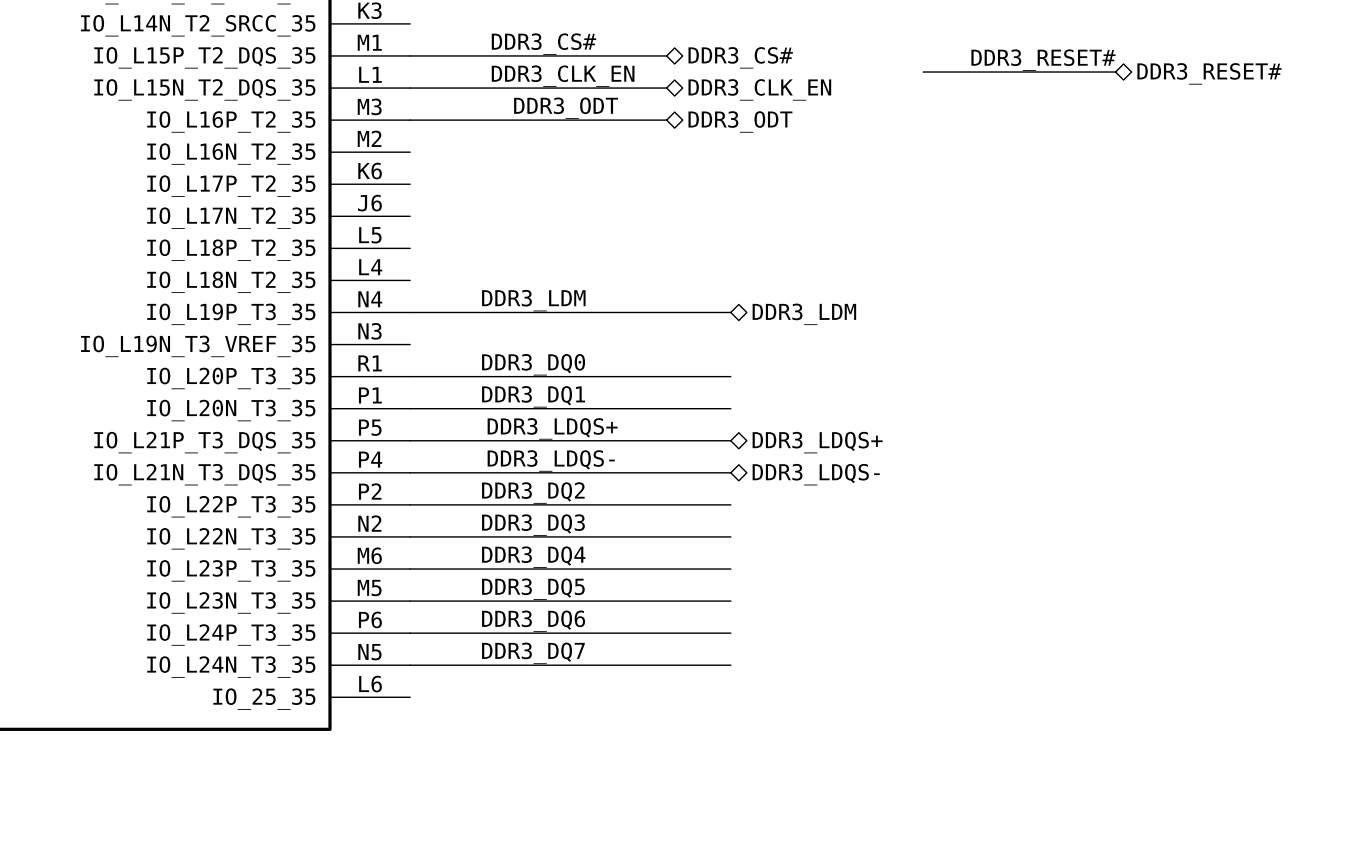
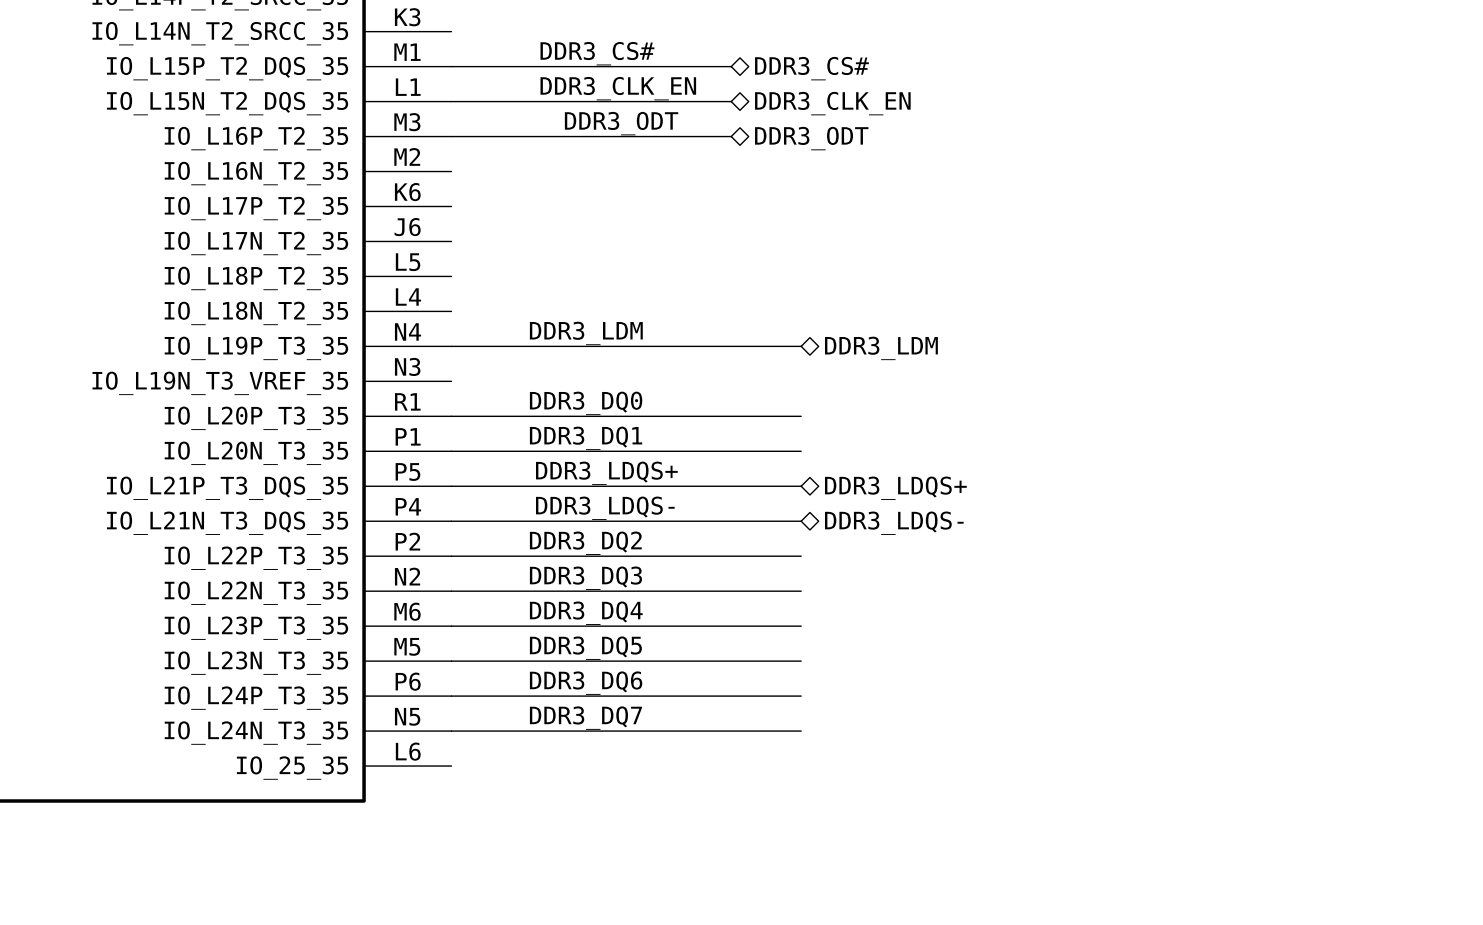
label: DDR3_RESET# (1043, 60) -> none
wire: (923, 72) (1115, 72) -> none
hierarchical label: DDR3_RESET# (1209, 73) -> none

